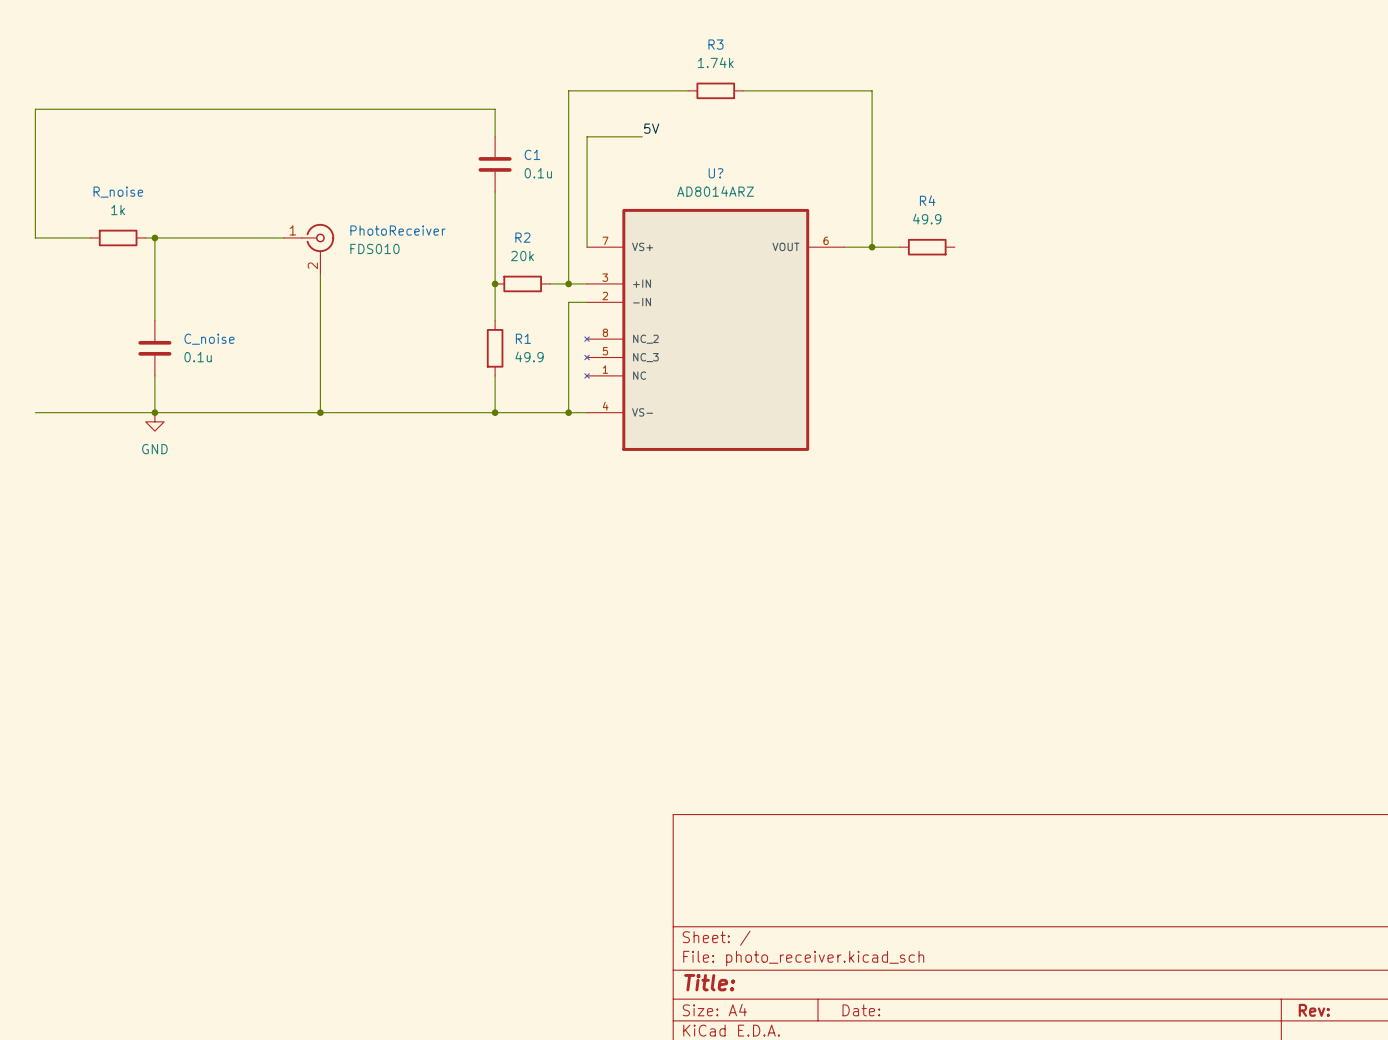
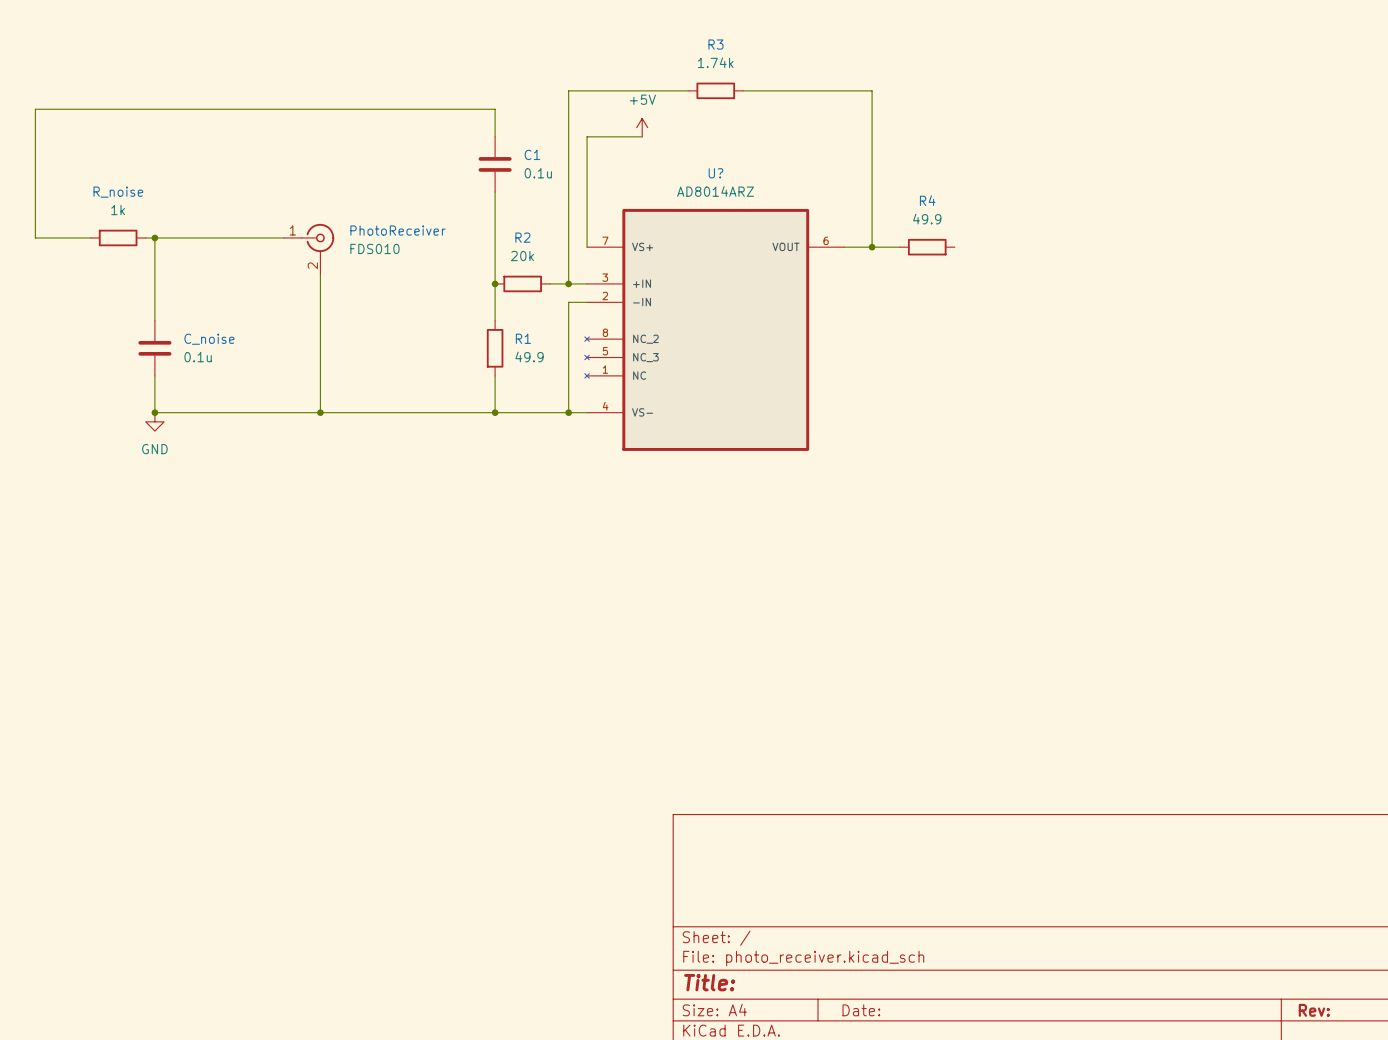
power symbol: none -> +5V (642, 127)
label: 5V (651, 128) -> none
wire: (35, 412) (154, 412) -> none

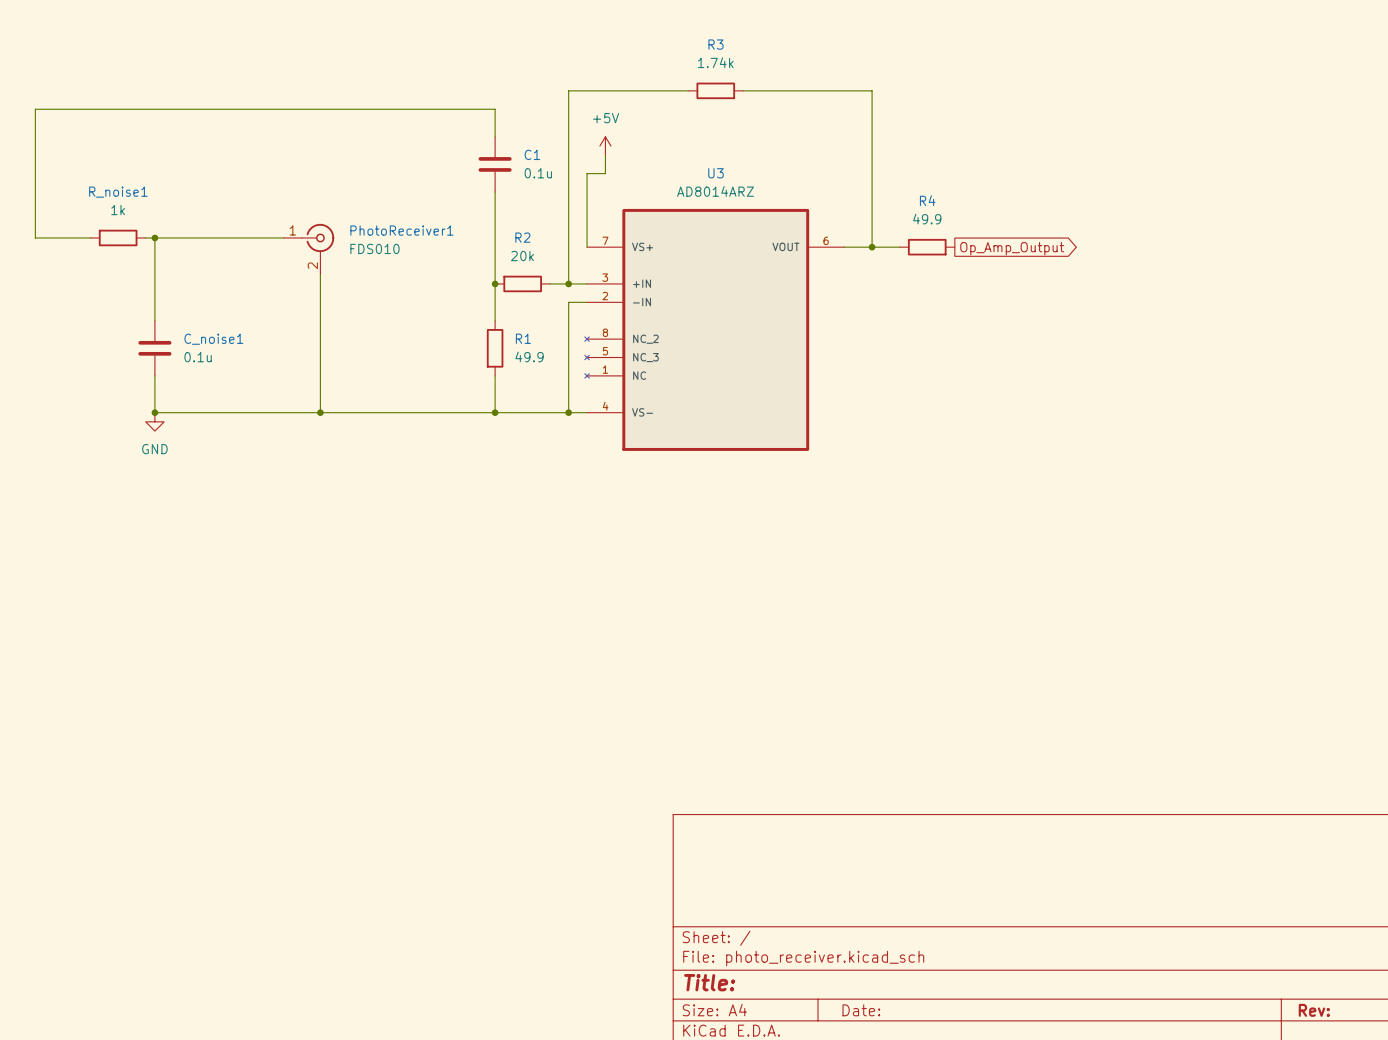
power symbol position: +5V (642, 127) -> +5V (605, 146)
wire: (642, 136) (587, 136) (587, 173) -> (605, 155) (605, 173) (587, 173)
U? name: U? (715, 173) -> U3 (715, 173)
R_noise name: R_noise (118, 192) -> R_noise1 (118, 192)
PhotoReceiver name: PhotoReceiver (397, 230) -> PhotoReceiver1 (401, 230)
global label: none -> Op_Amp_Output (1012, 248)
C_noise name: C_noise (209, 339) -> C_noise1 (213, 339)

